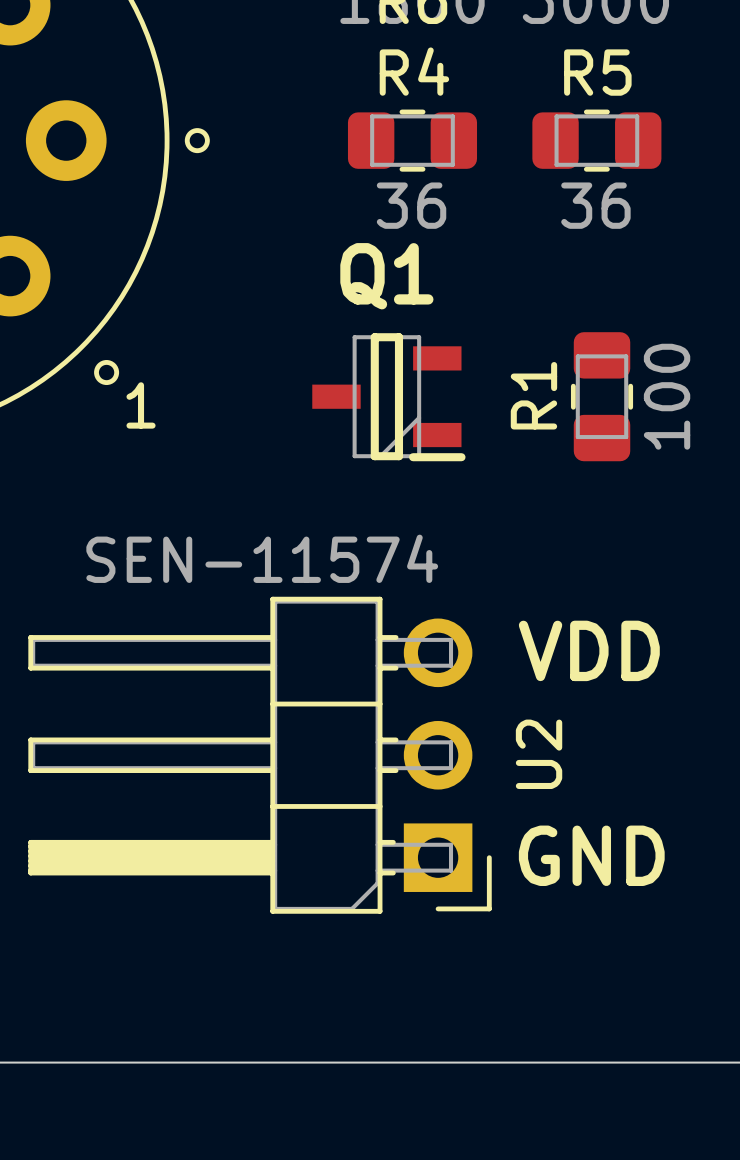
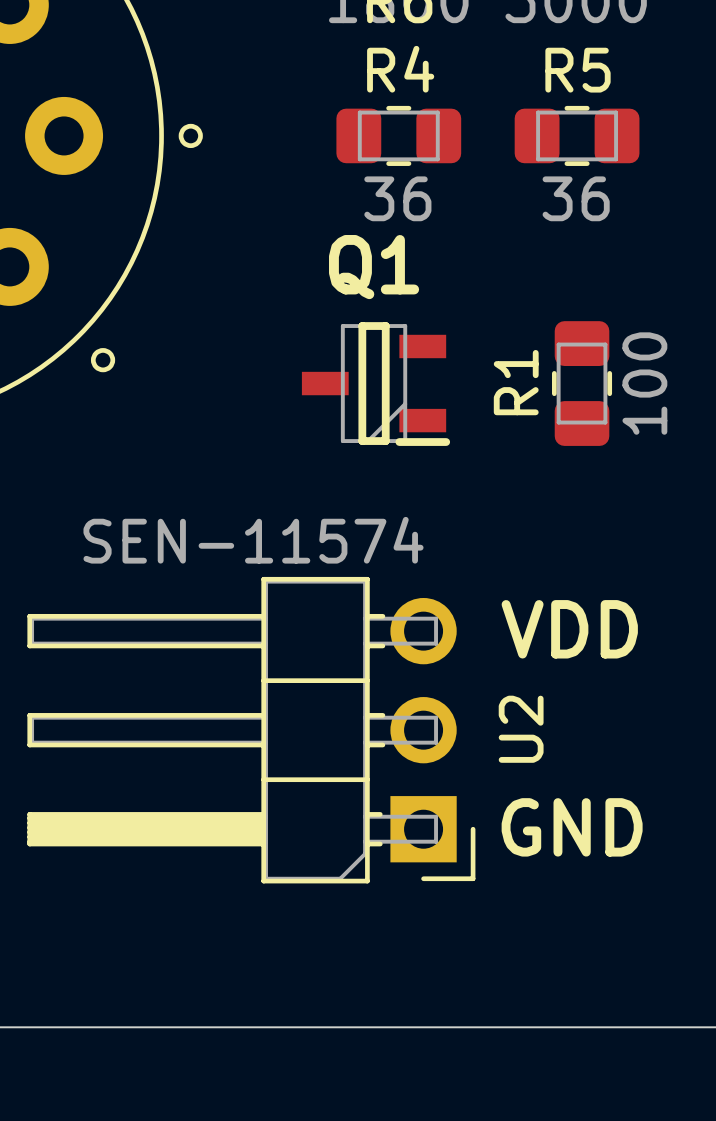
part text: 1 (141, 405) -> none

